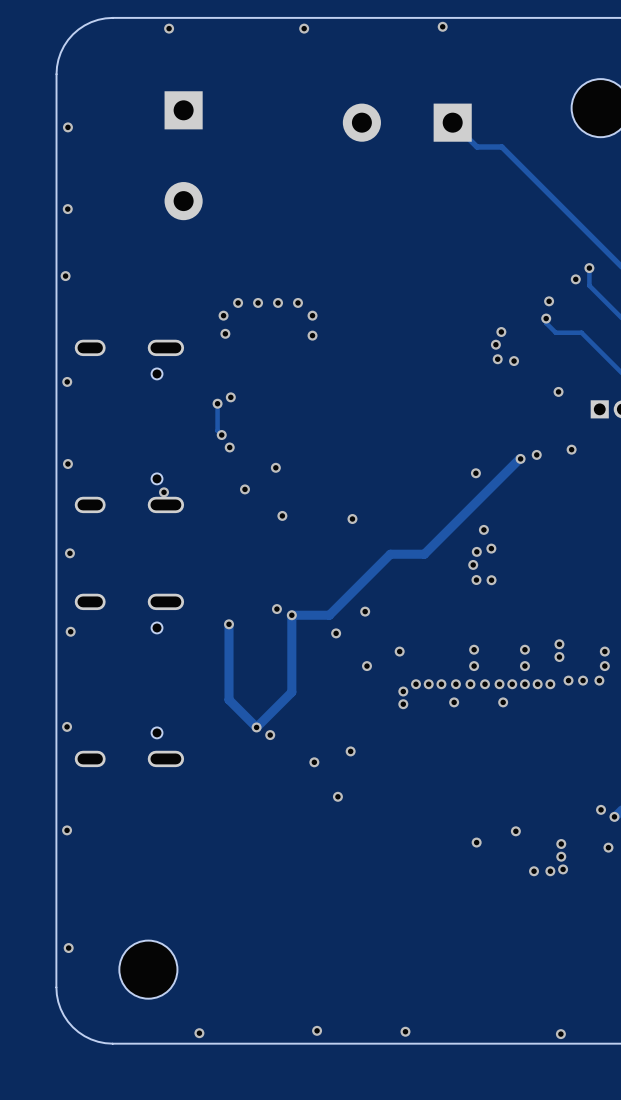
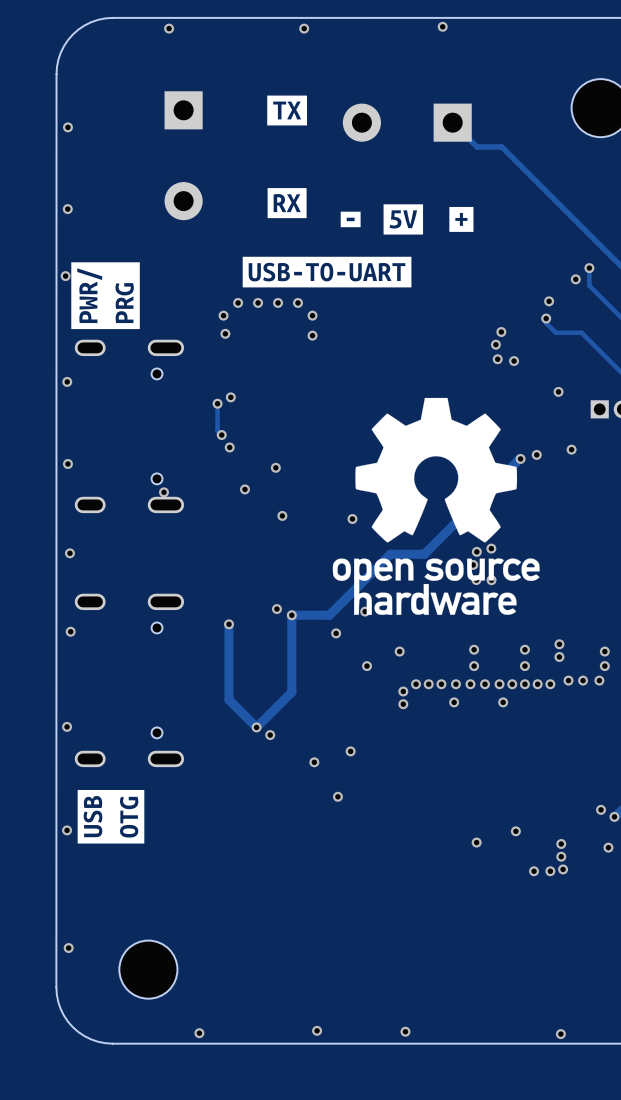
drawing: none -> [267, 95, 308, 126]
drawing: none -> [267, 188, 307, 219]
drawing: none -> [383, 204, 424, 235]
drawing: none -> [449, 206, 474, 232]
drawing: none -> [340, 211, 361, 228]
drawing: none -> [242, 256, 412, 288]
drawing: none -> [71, 262, 140, 330]
drawing: none -> [332, 397, 540, 615]
drawing: none -> [77, 789, 145, 844]

